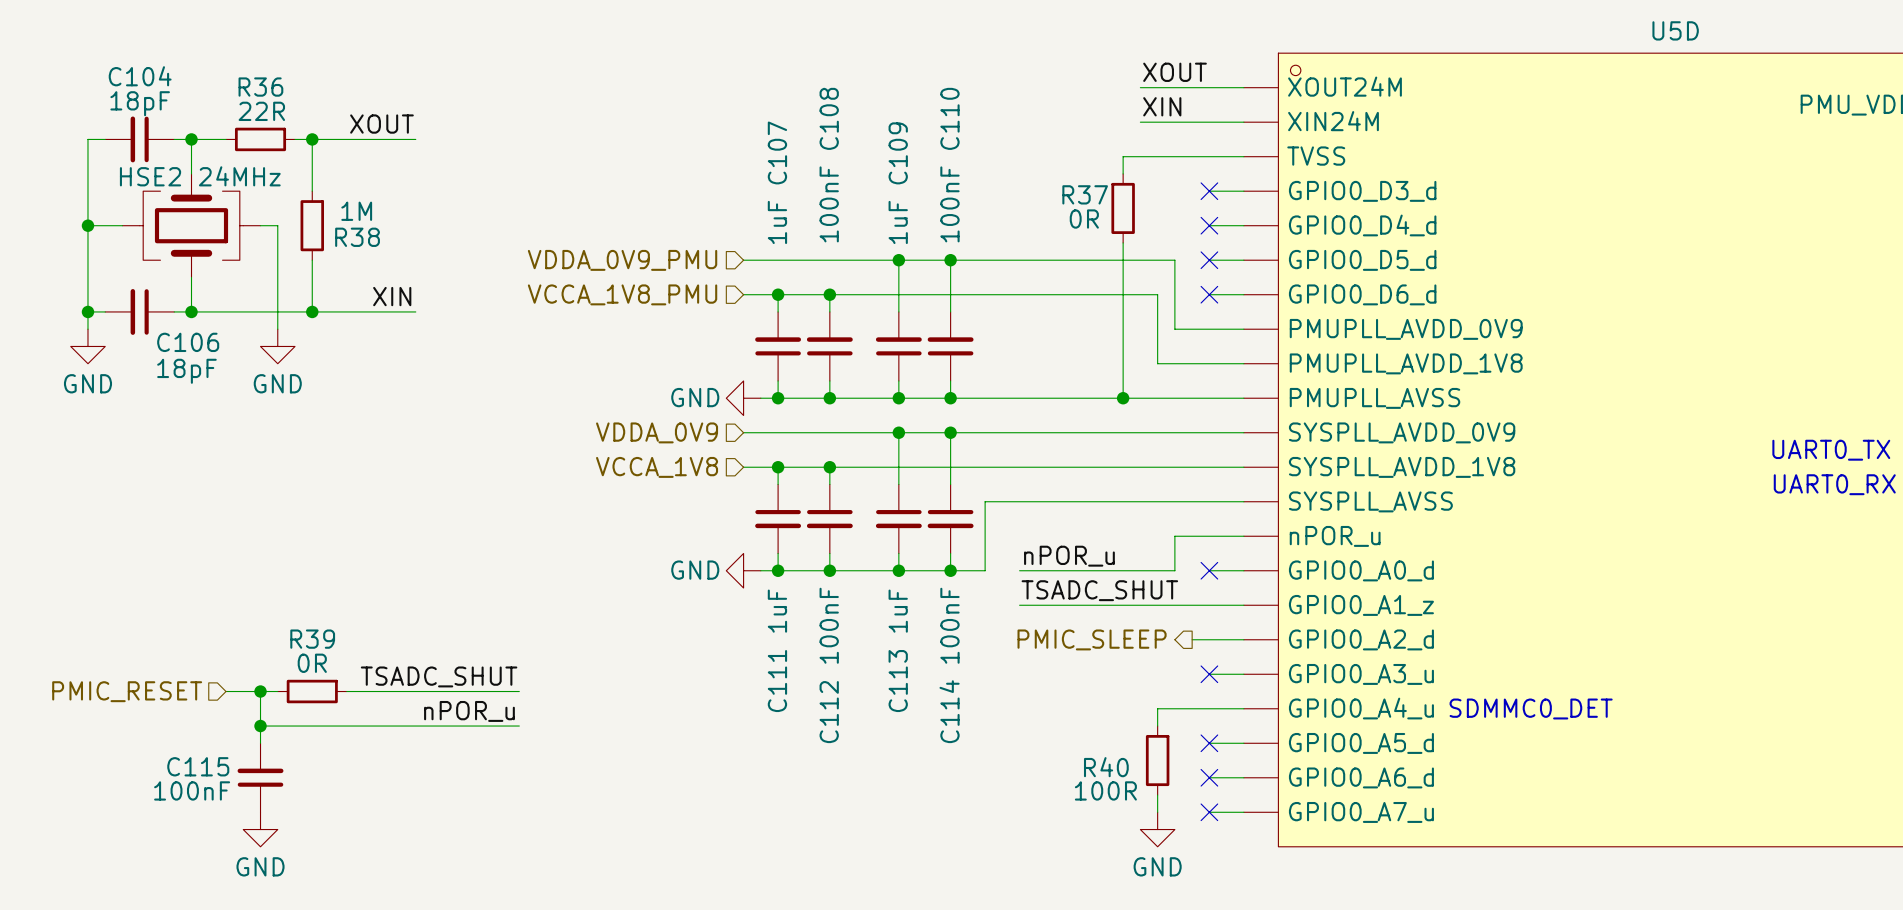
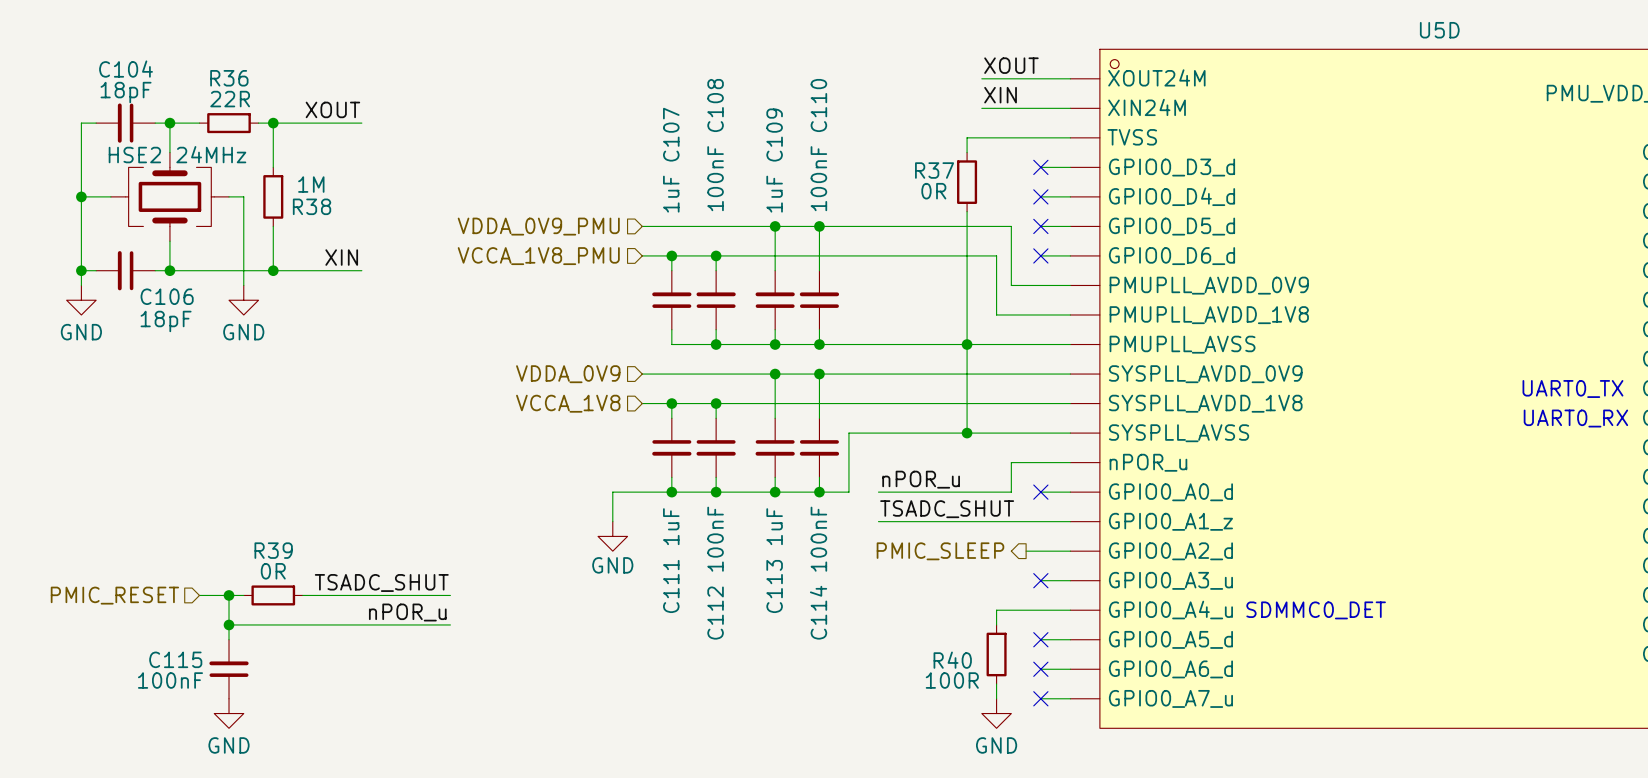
power symbol: GND (743, 398) -> none
wire: (760, 398) (778, 398) -> none
junction: (778, 398) -> none
wire: none -> (967, 344) (967, 433)
junction: none -> (967, 433)
power symbol rotation: 0° (743, 570) -> 90° counterclockwise (612, 536)
power symbol position: GND (743, 570) -> GND (612, 536)
wire: none -> (657, 492) (612, 492) (612, 521)

